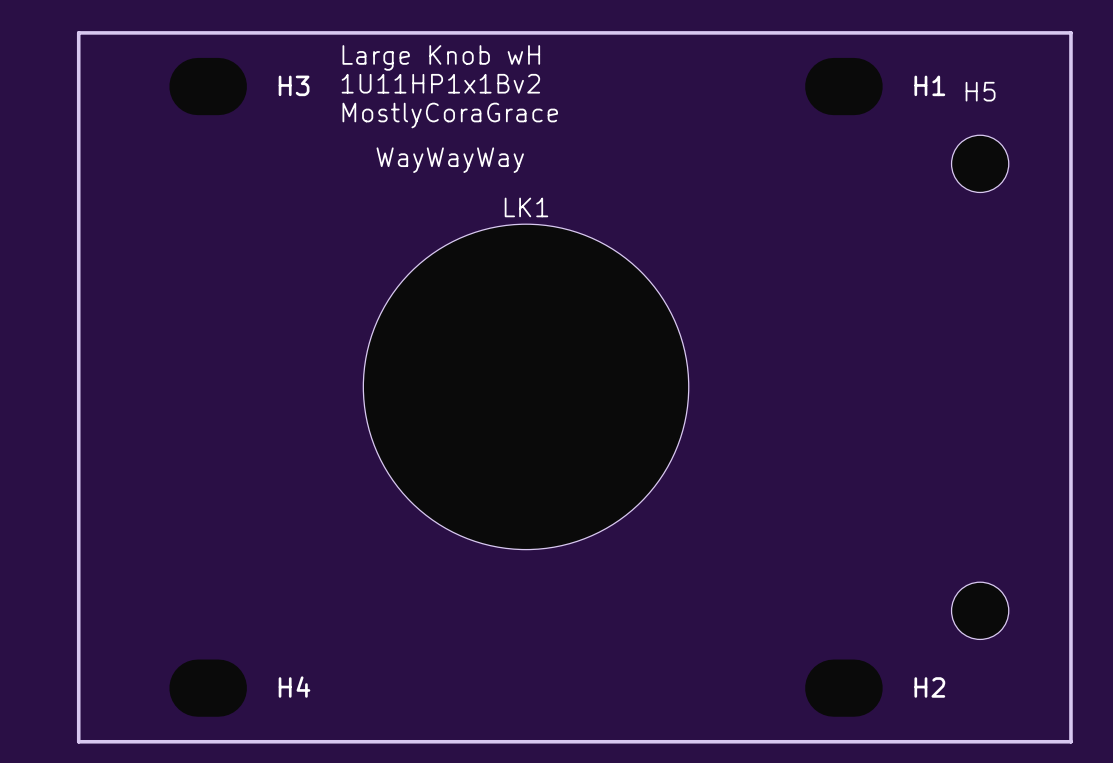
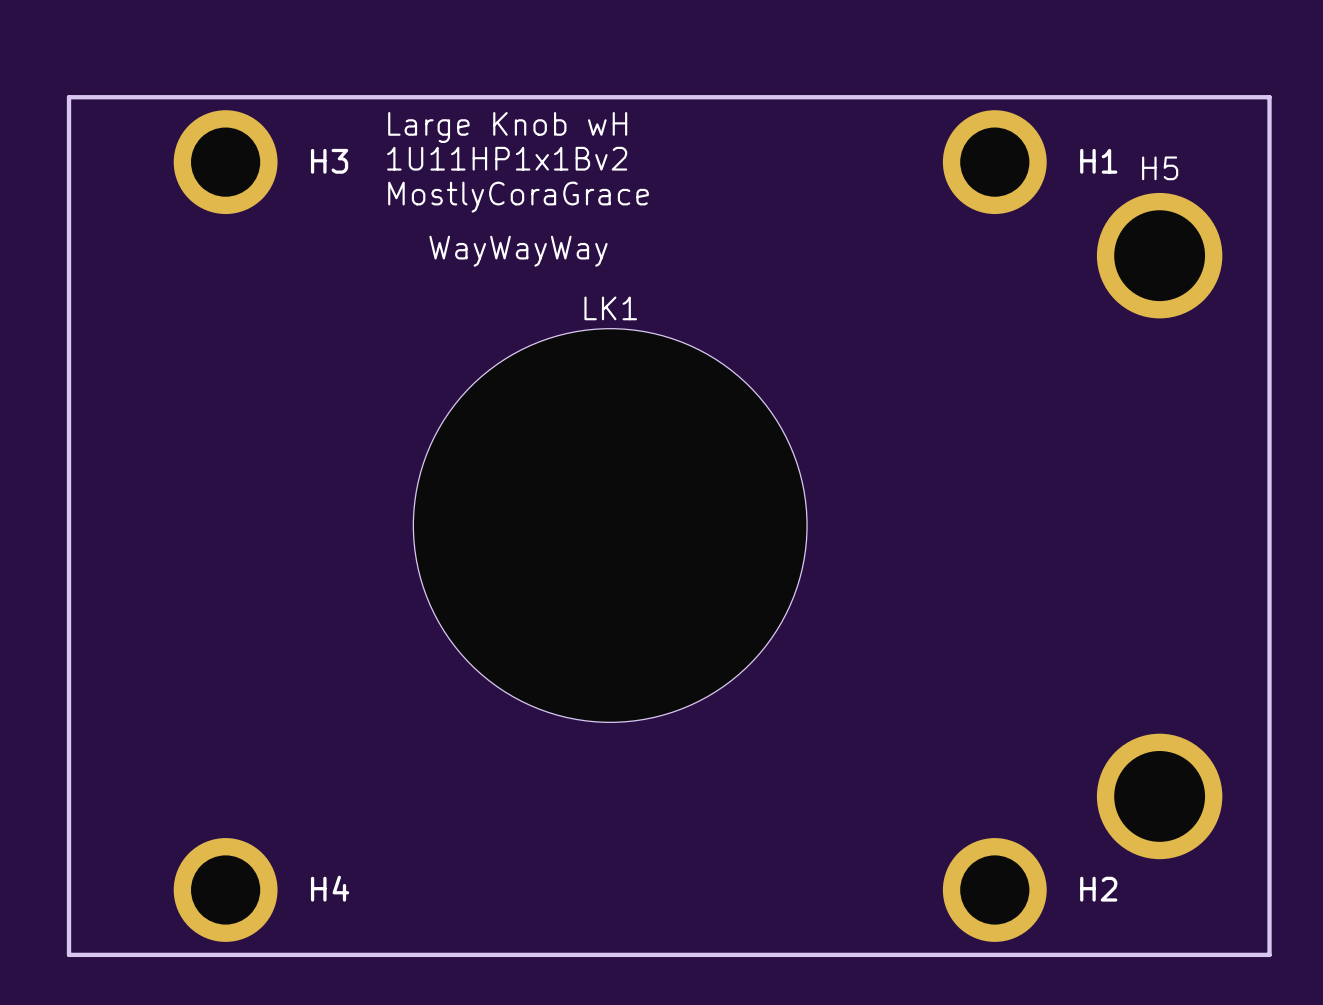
H3 footprint: [169, 57, 247, 116] -> [173, 110, 278, 215]
H1 footprint: [805, 57, 883, 116] -> [942, 110, 1047, 215]
H5 footprint: [951, 135, 1009, 640] -> [1096, 192, 1223, 860]
H4 footprint: [169, 659, 247, 717] -> [173, 838, 278, 942]
H2 footprint: [805, 659, 883, 717] -> [942, 838, 1047, 942]

